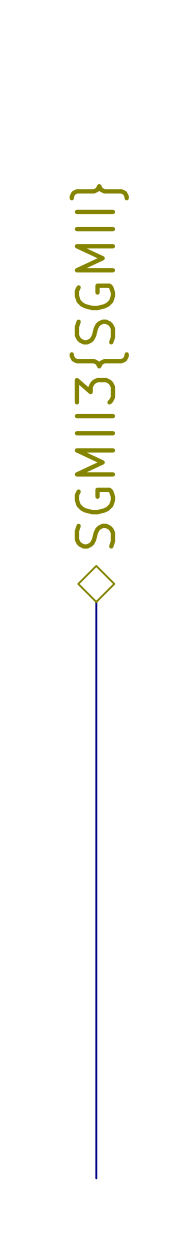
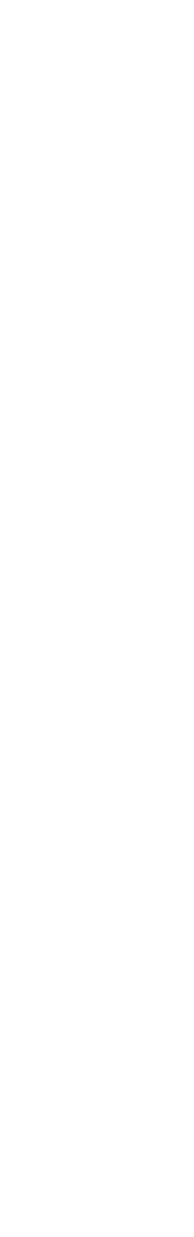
hierarchical label: SGMII3{SGMII} (99, 366) -> none
bus: (96, 601) (96, 1178) -> none

